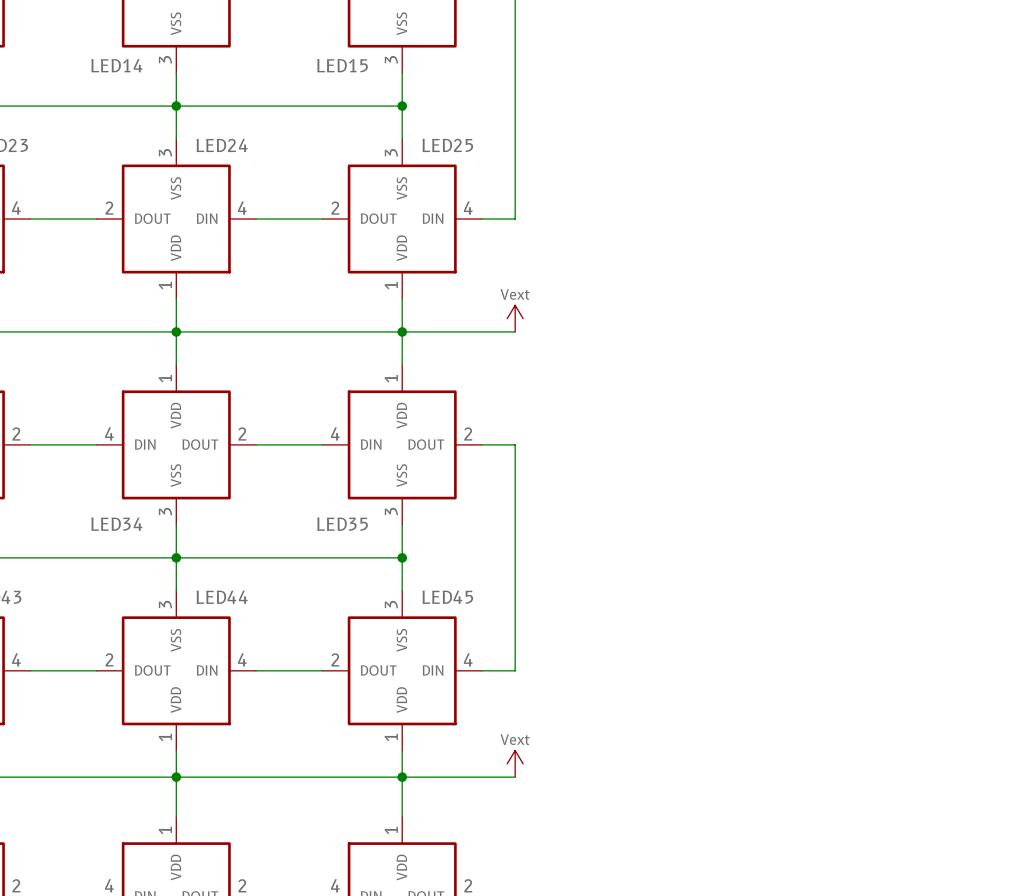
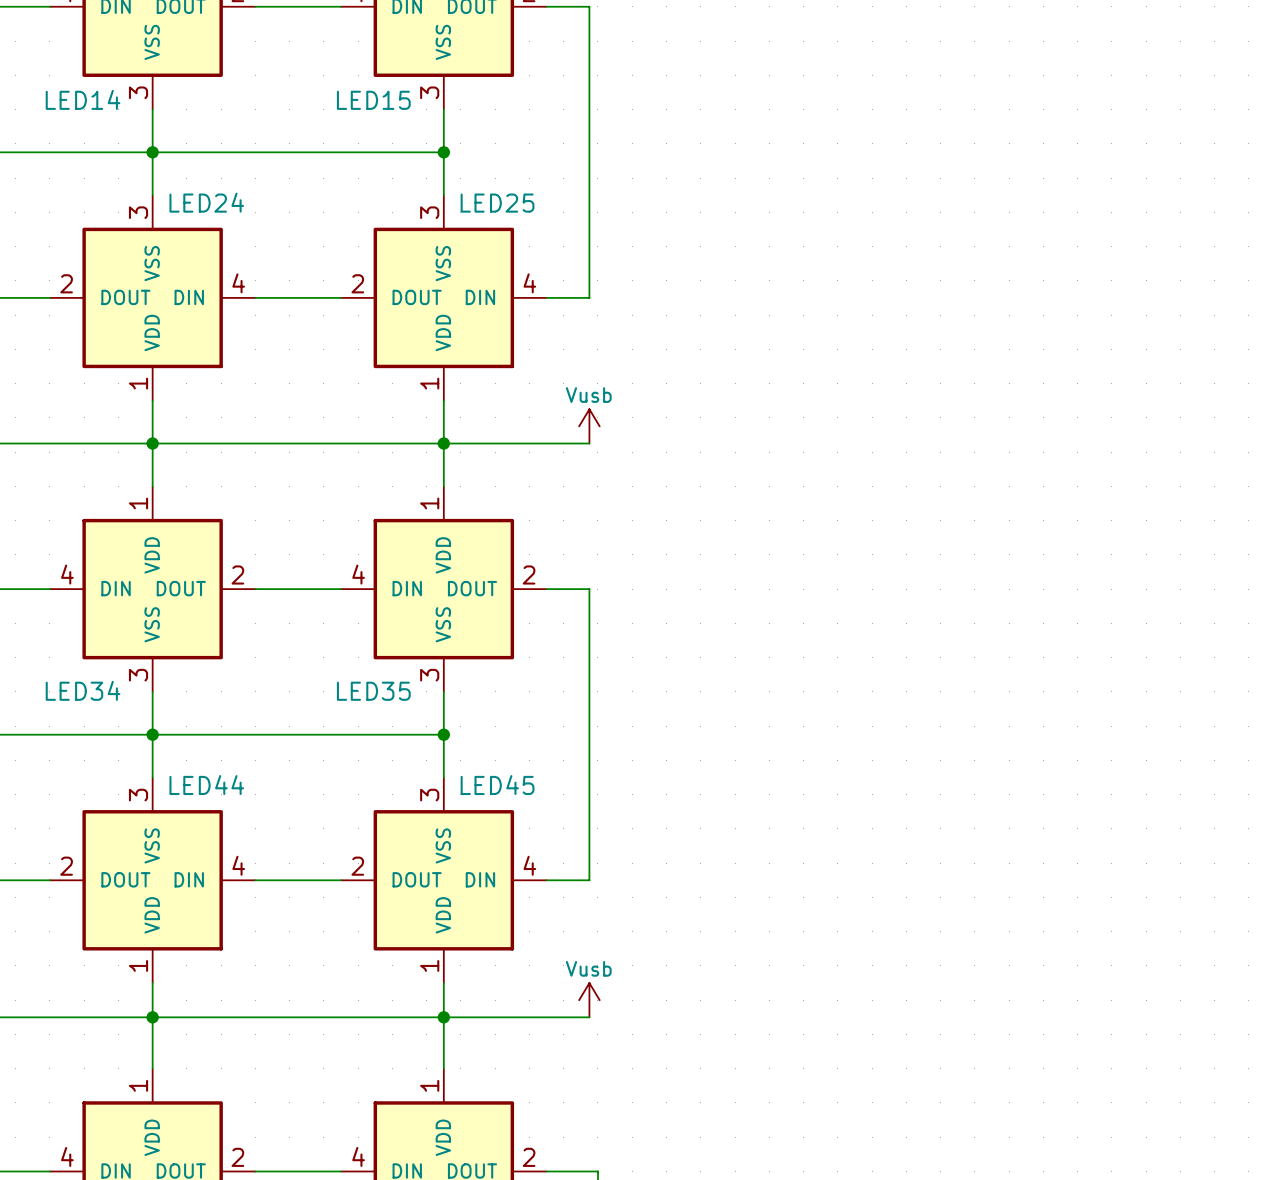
power symbol: Vext (515, 318) -> Vusb (589, 426)
power symbol: Vext (515, 763) -> Vusb (589, 1000)

